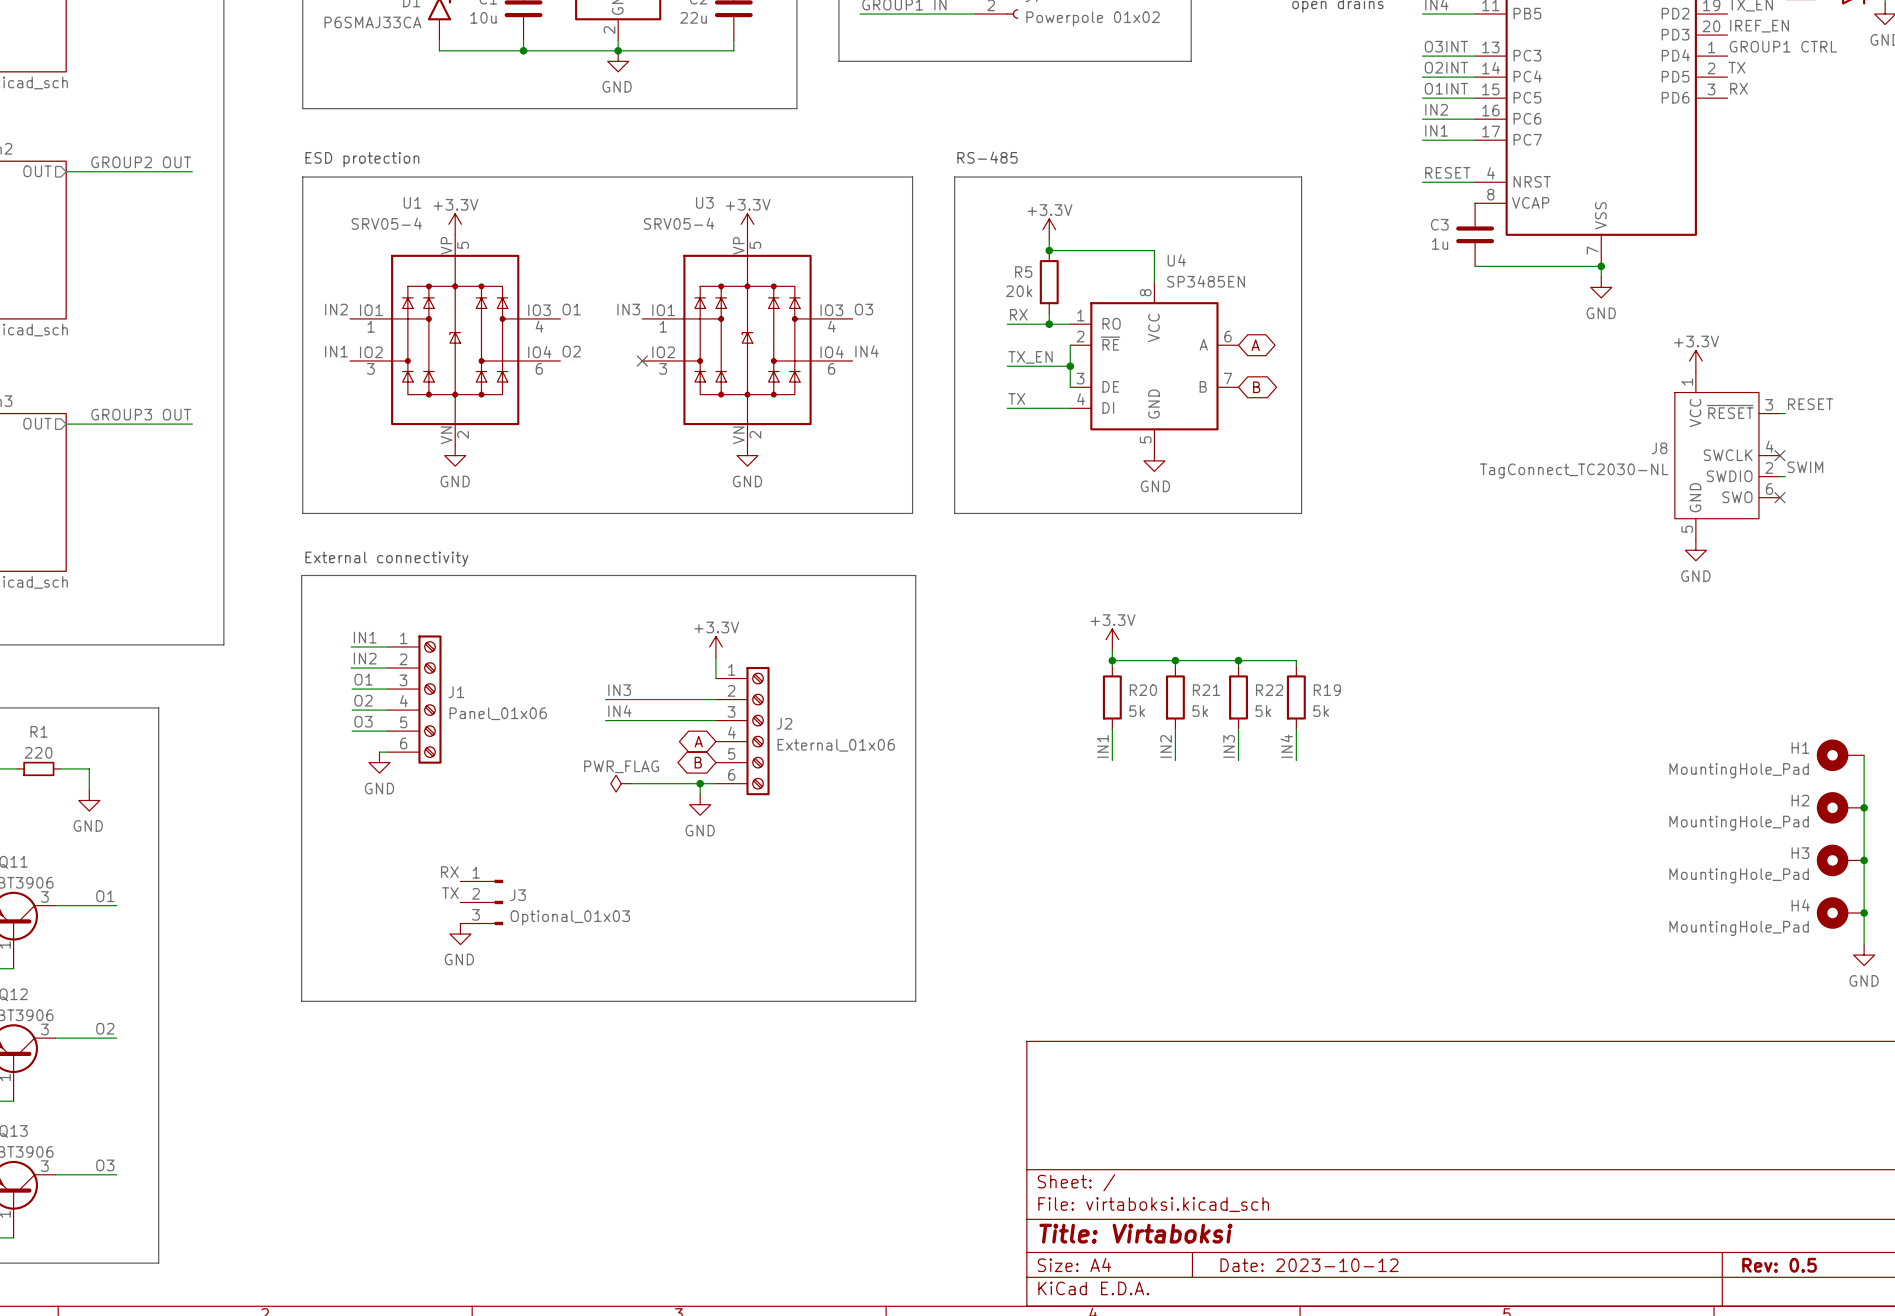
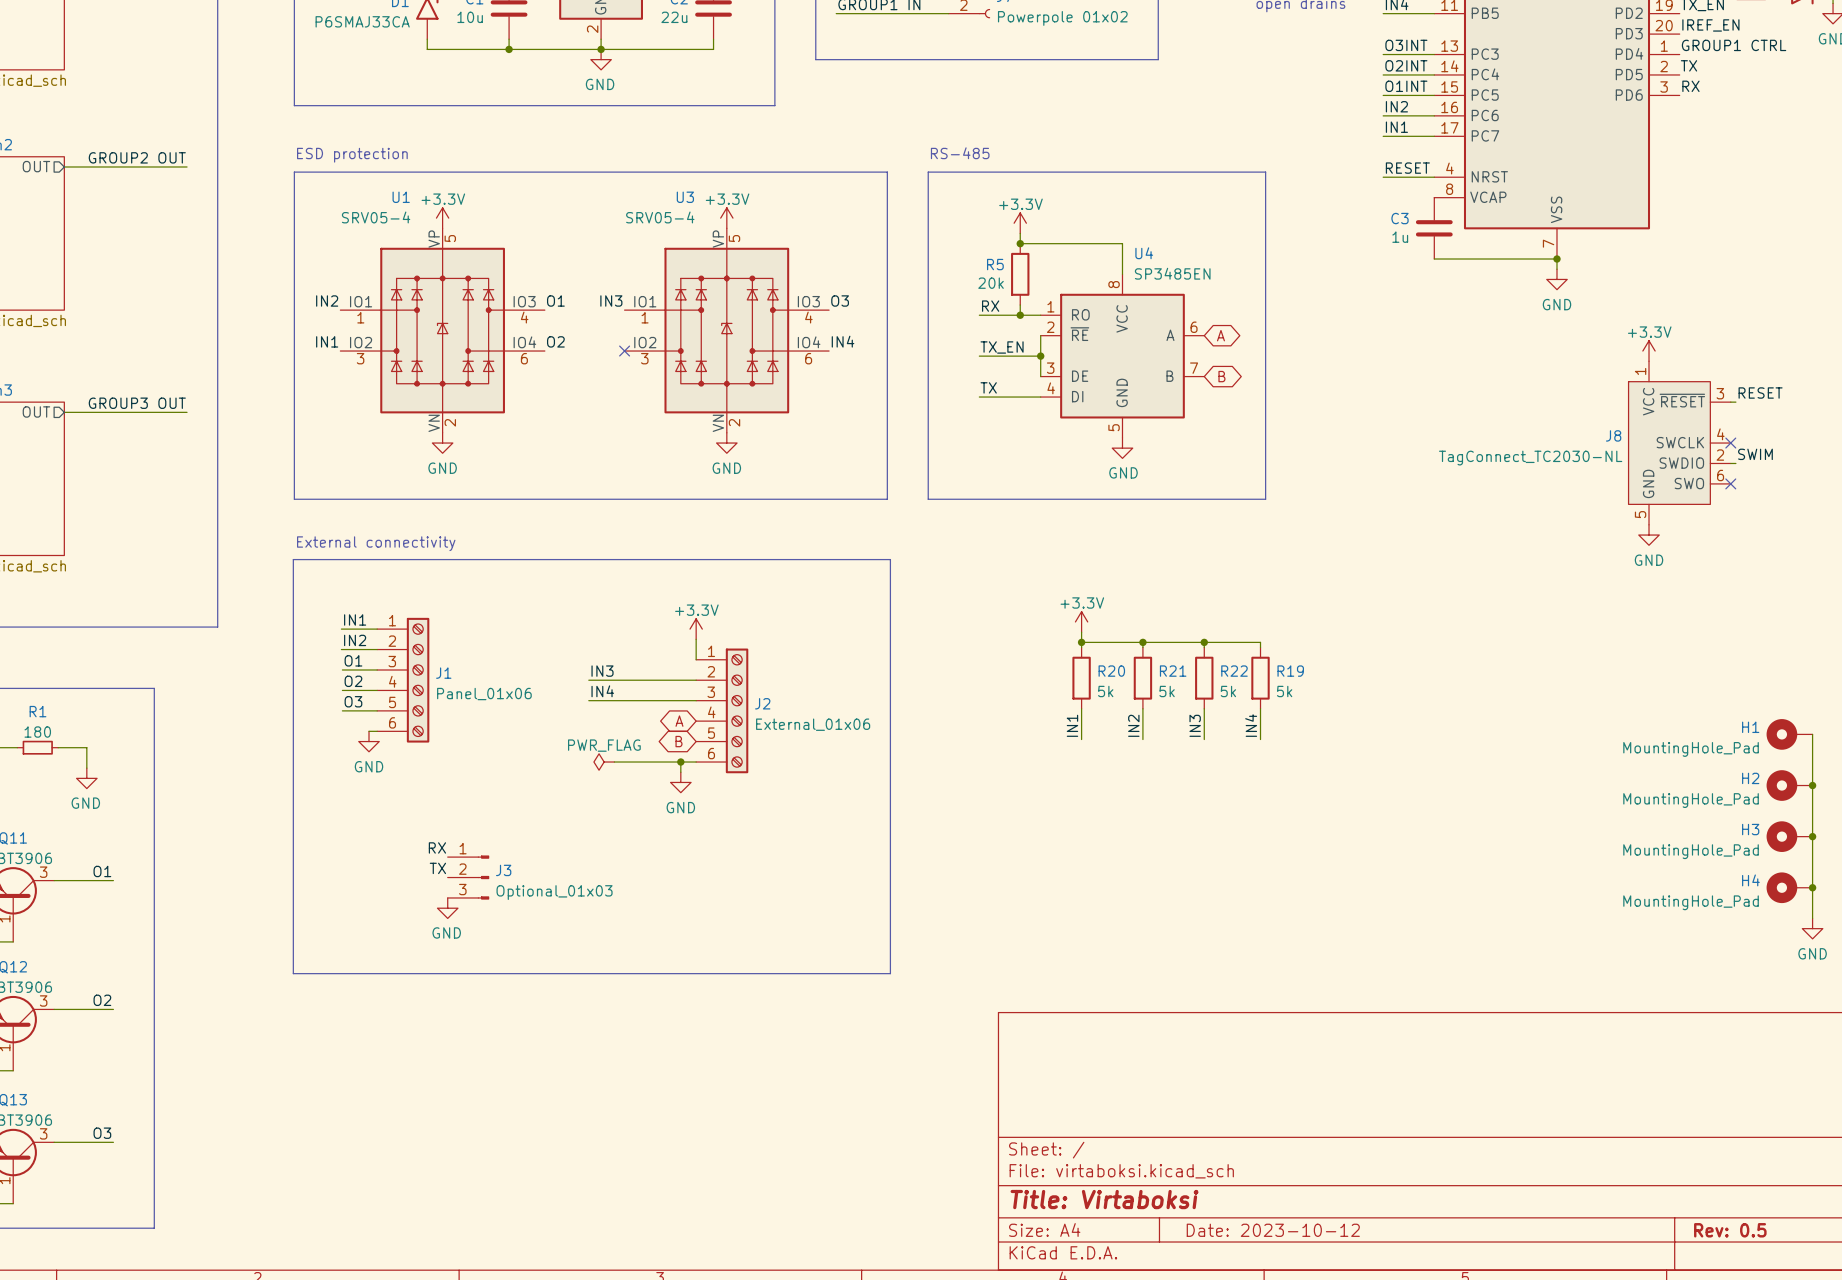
R1 value: 220 (38, 752) -> 180 (37, 732)

